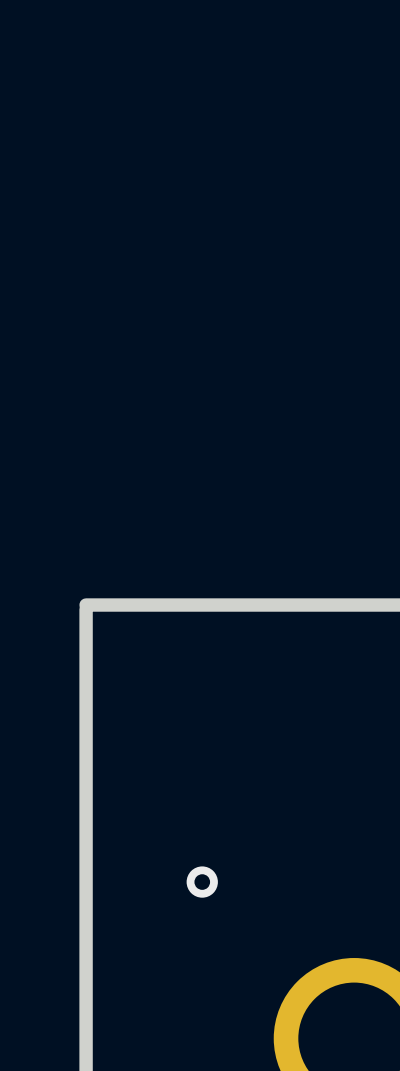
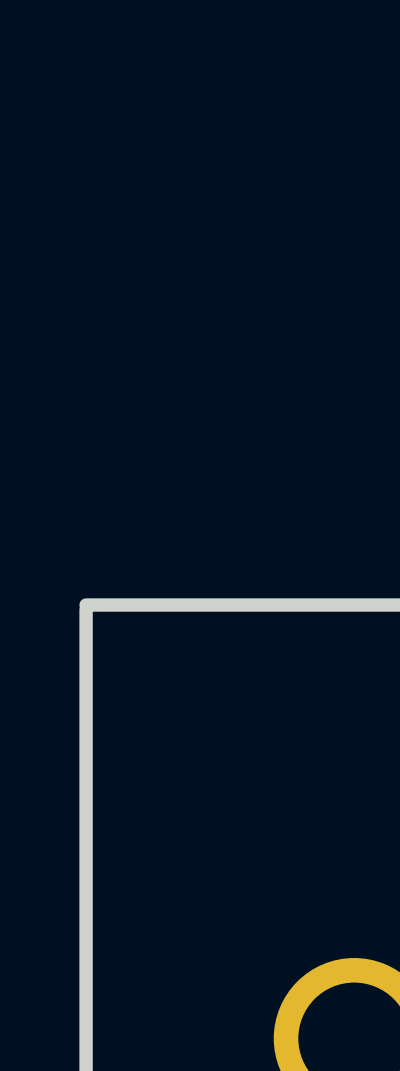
via: (202, 882) -> none

